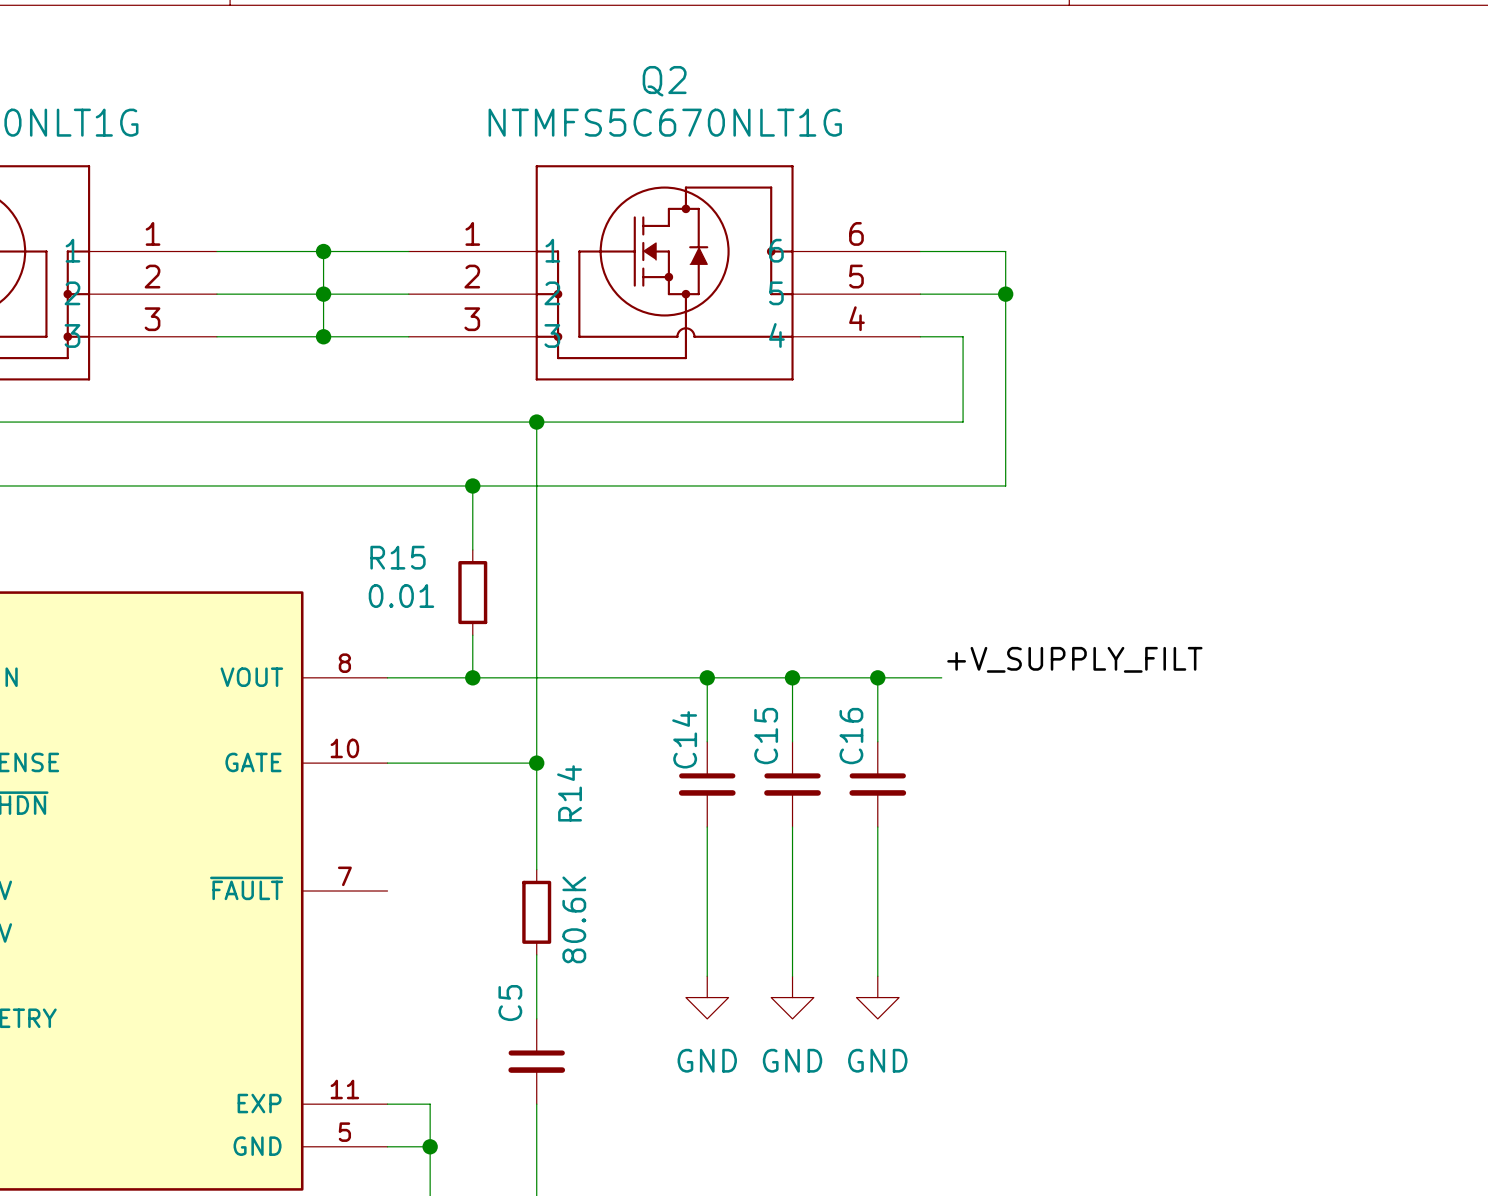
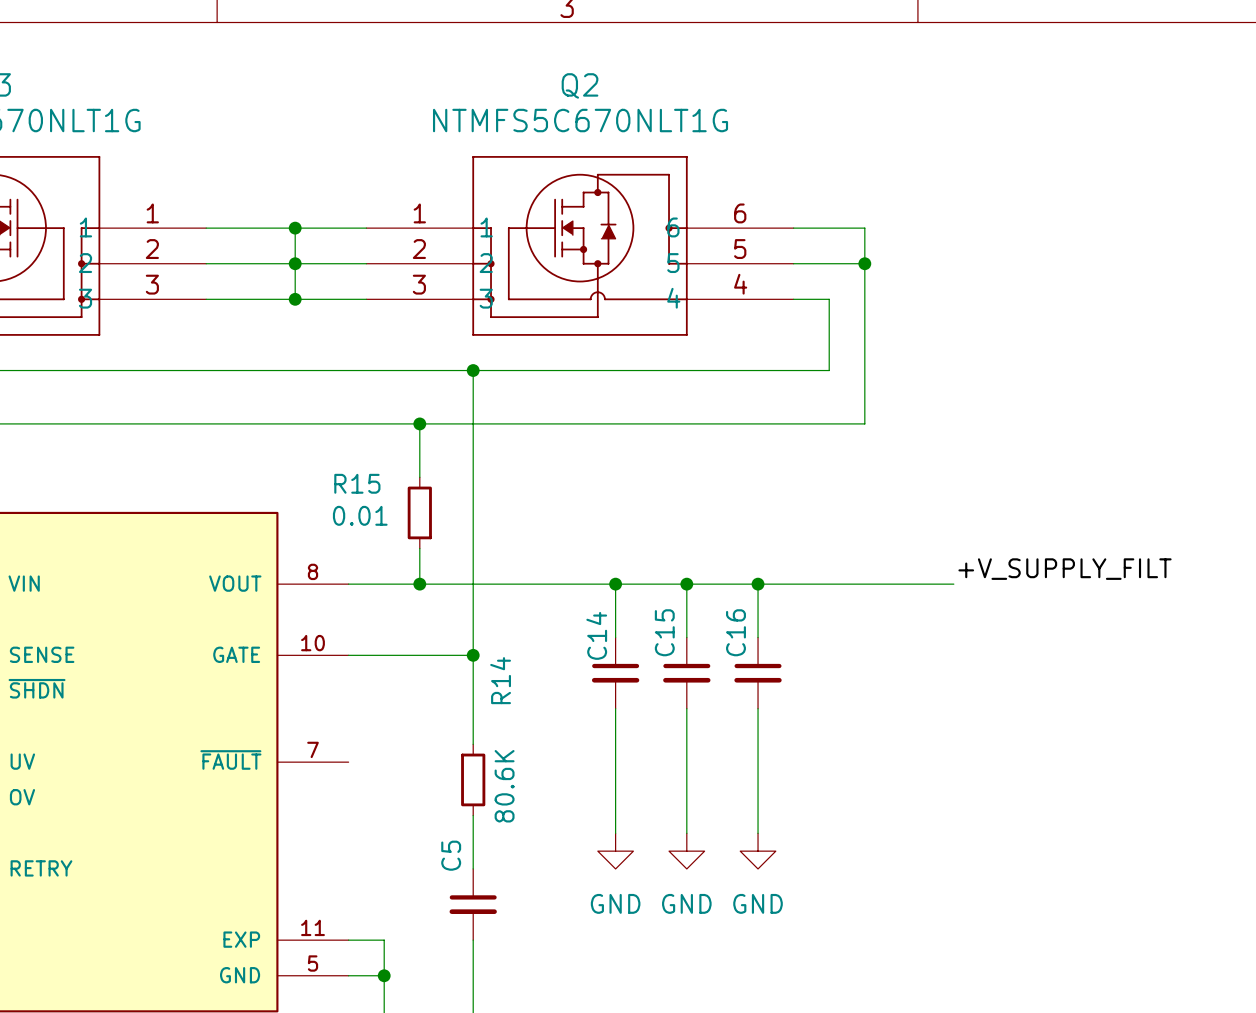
label position: +V_SUPPLY_FILT (1074, 659) -> +V_SUPPLY_FILT (1065, 569)
wire: none -> (811, 584) (953, 584)

